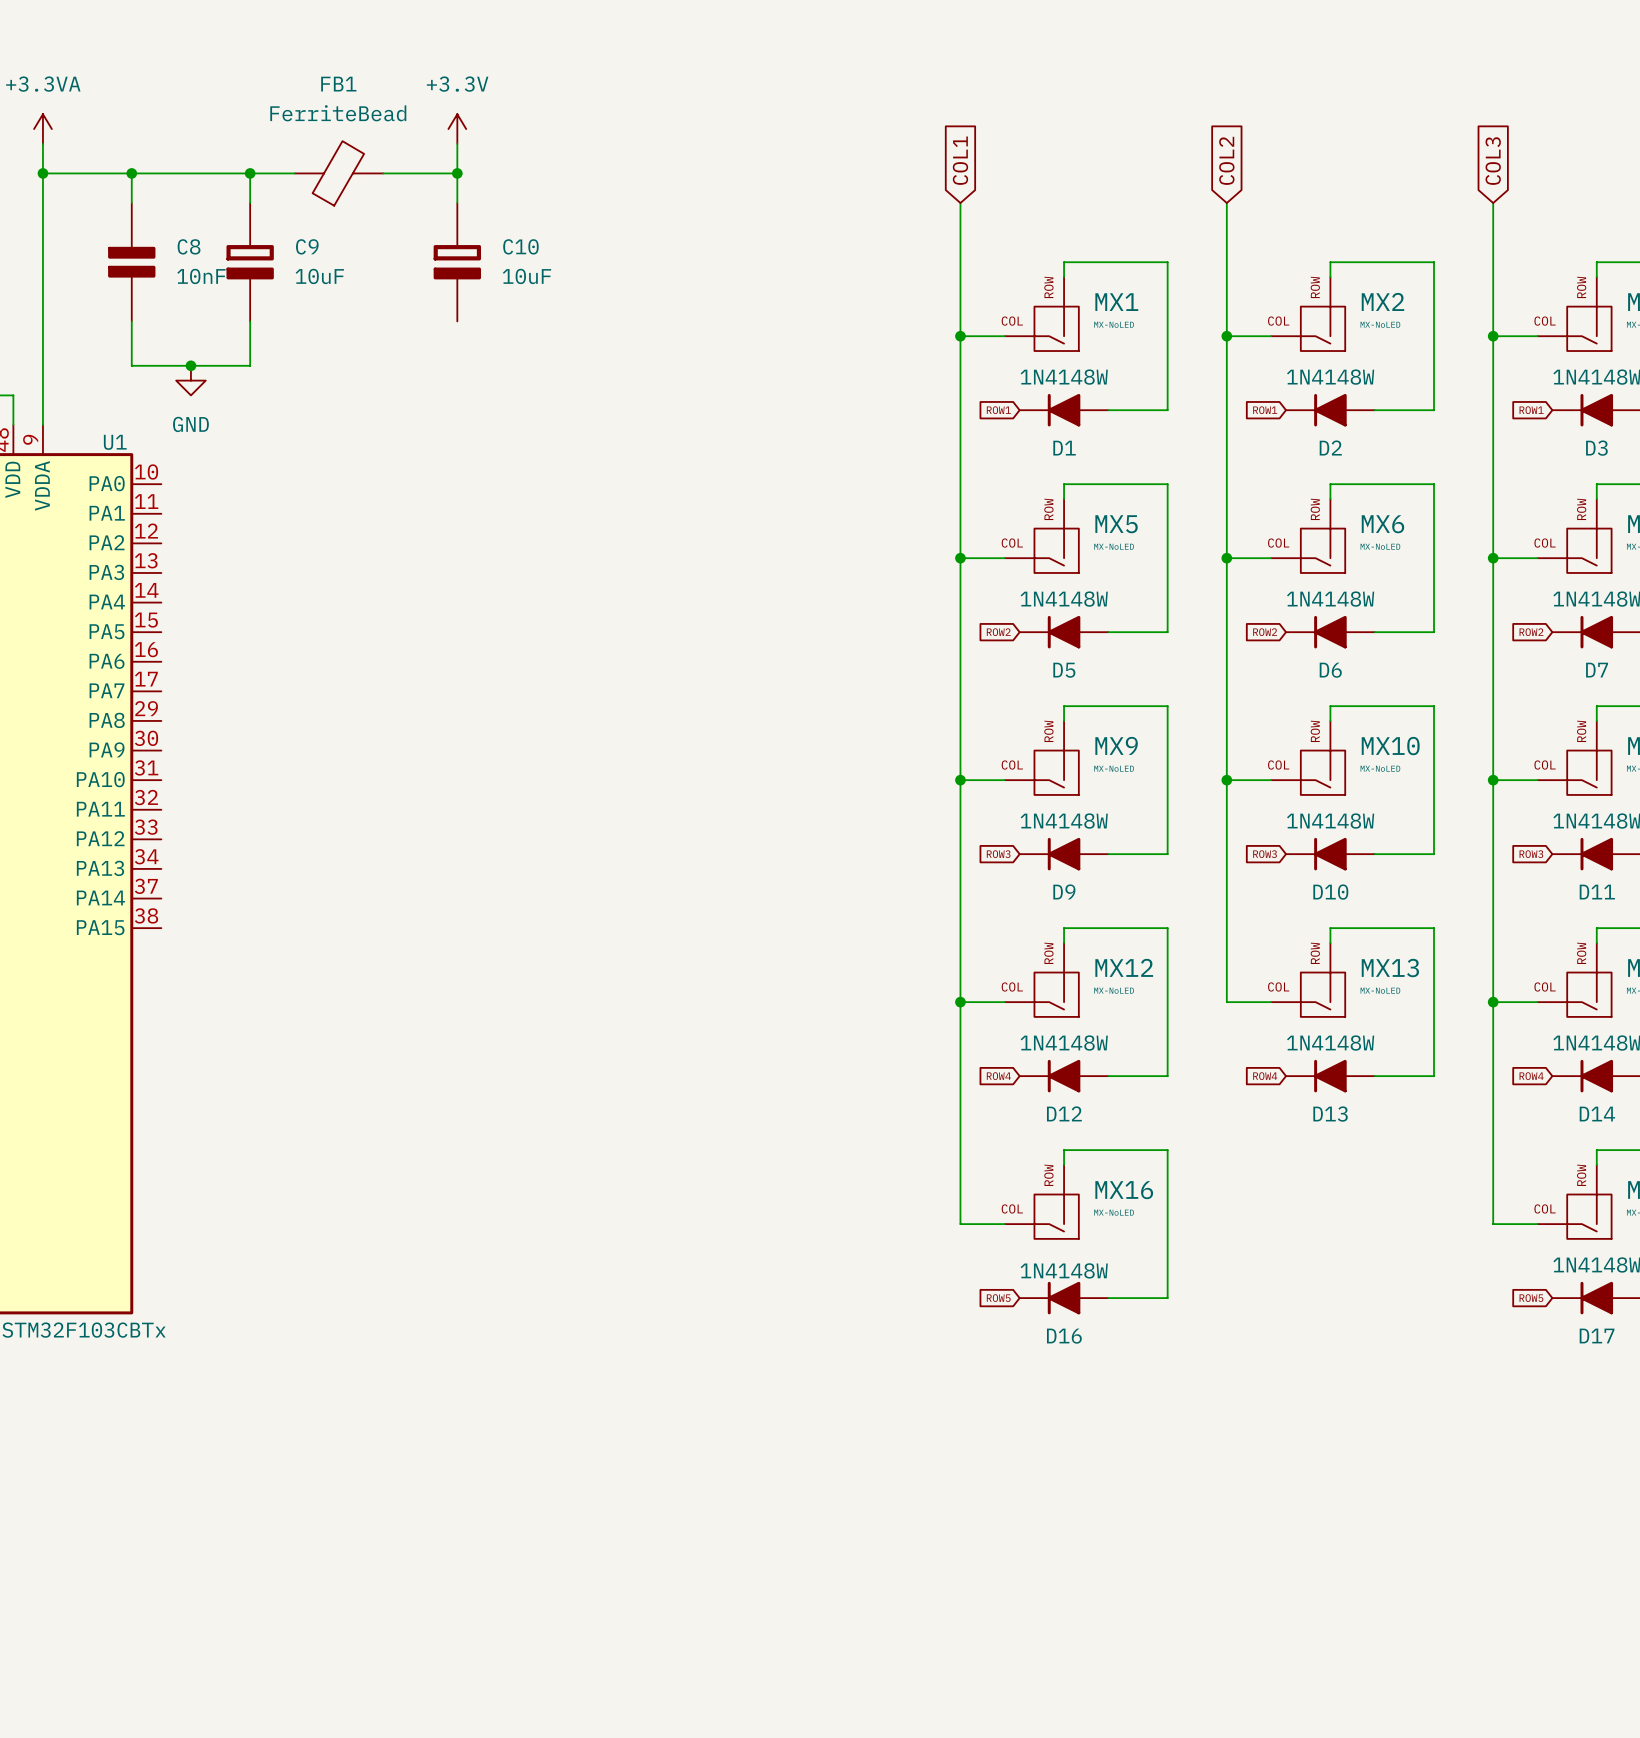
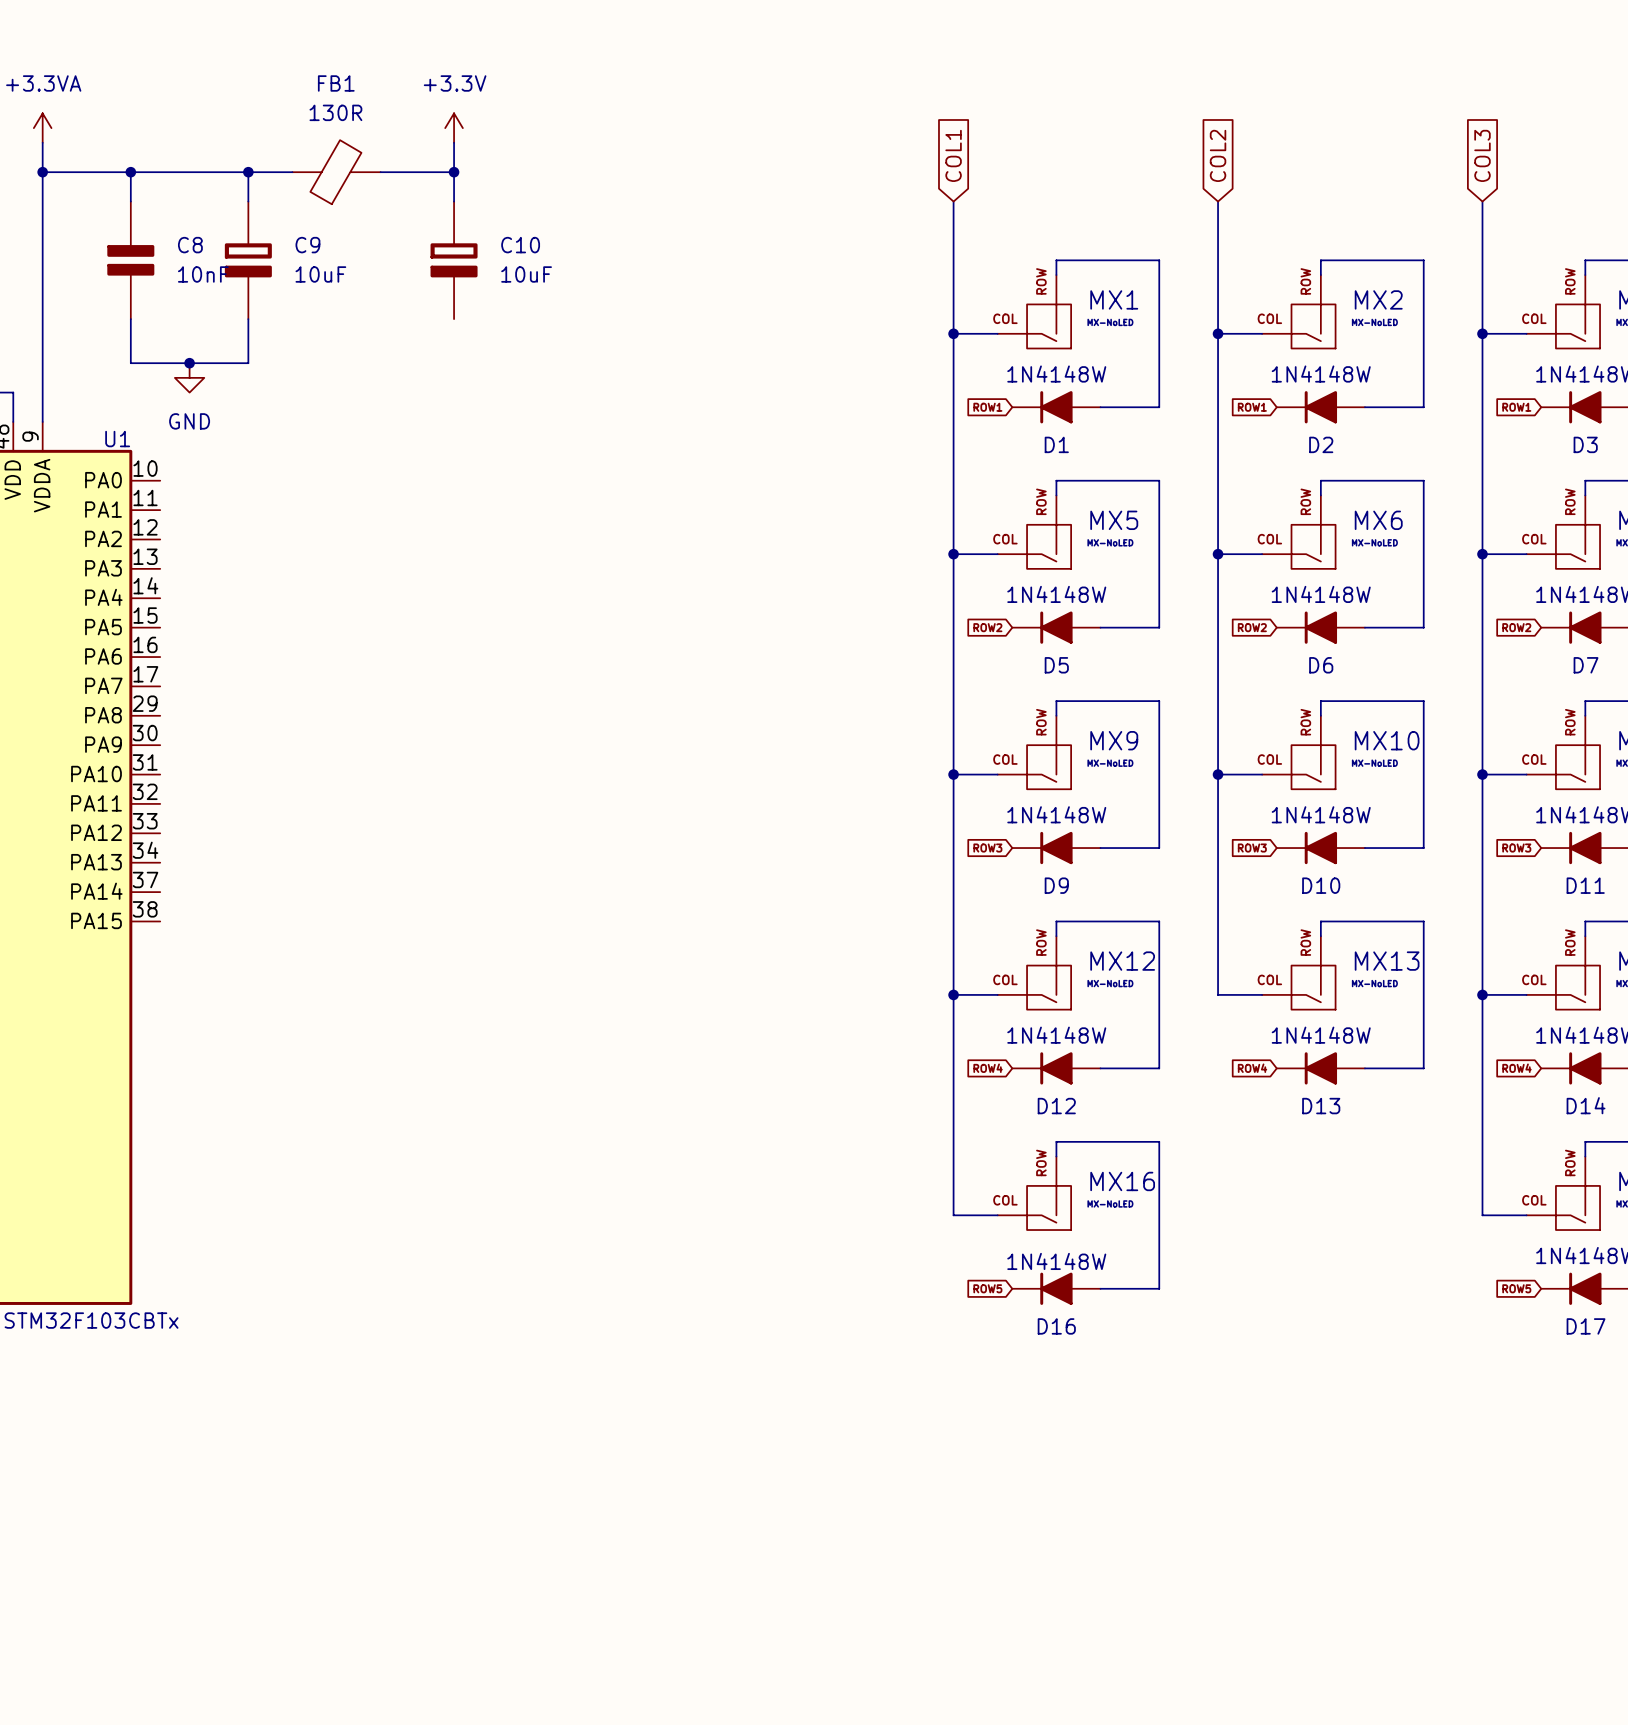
FB1 value: FerriteBead (338, 113) -> 130R (335, 112)

